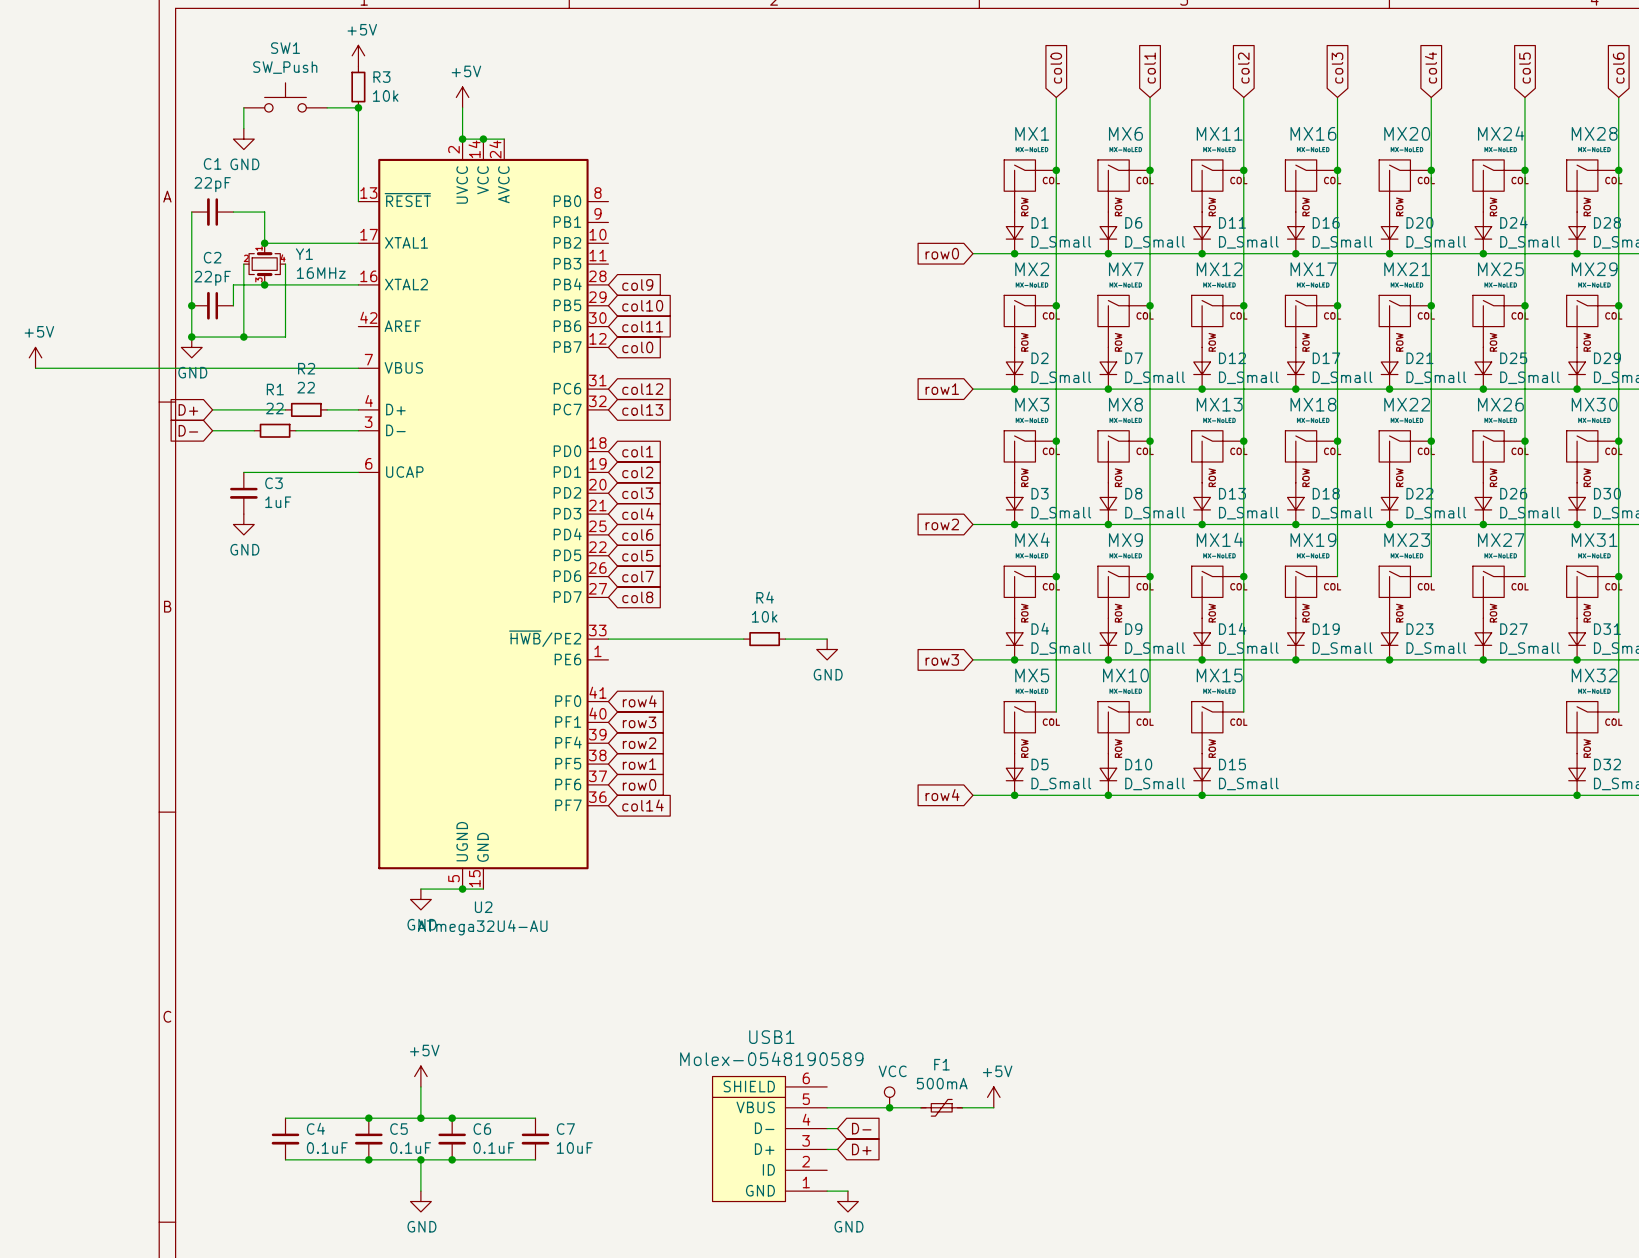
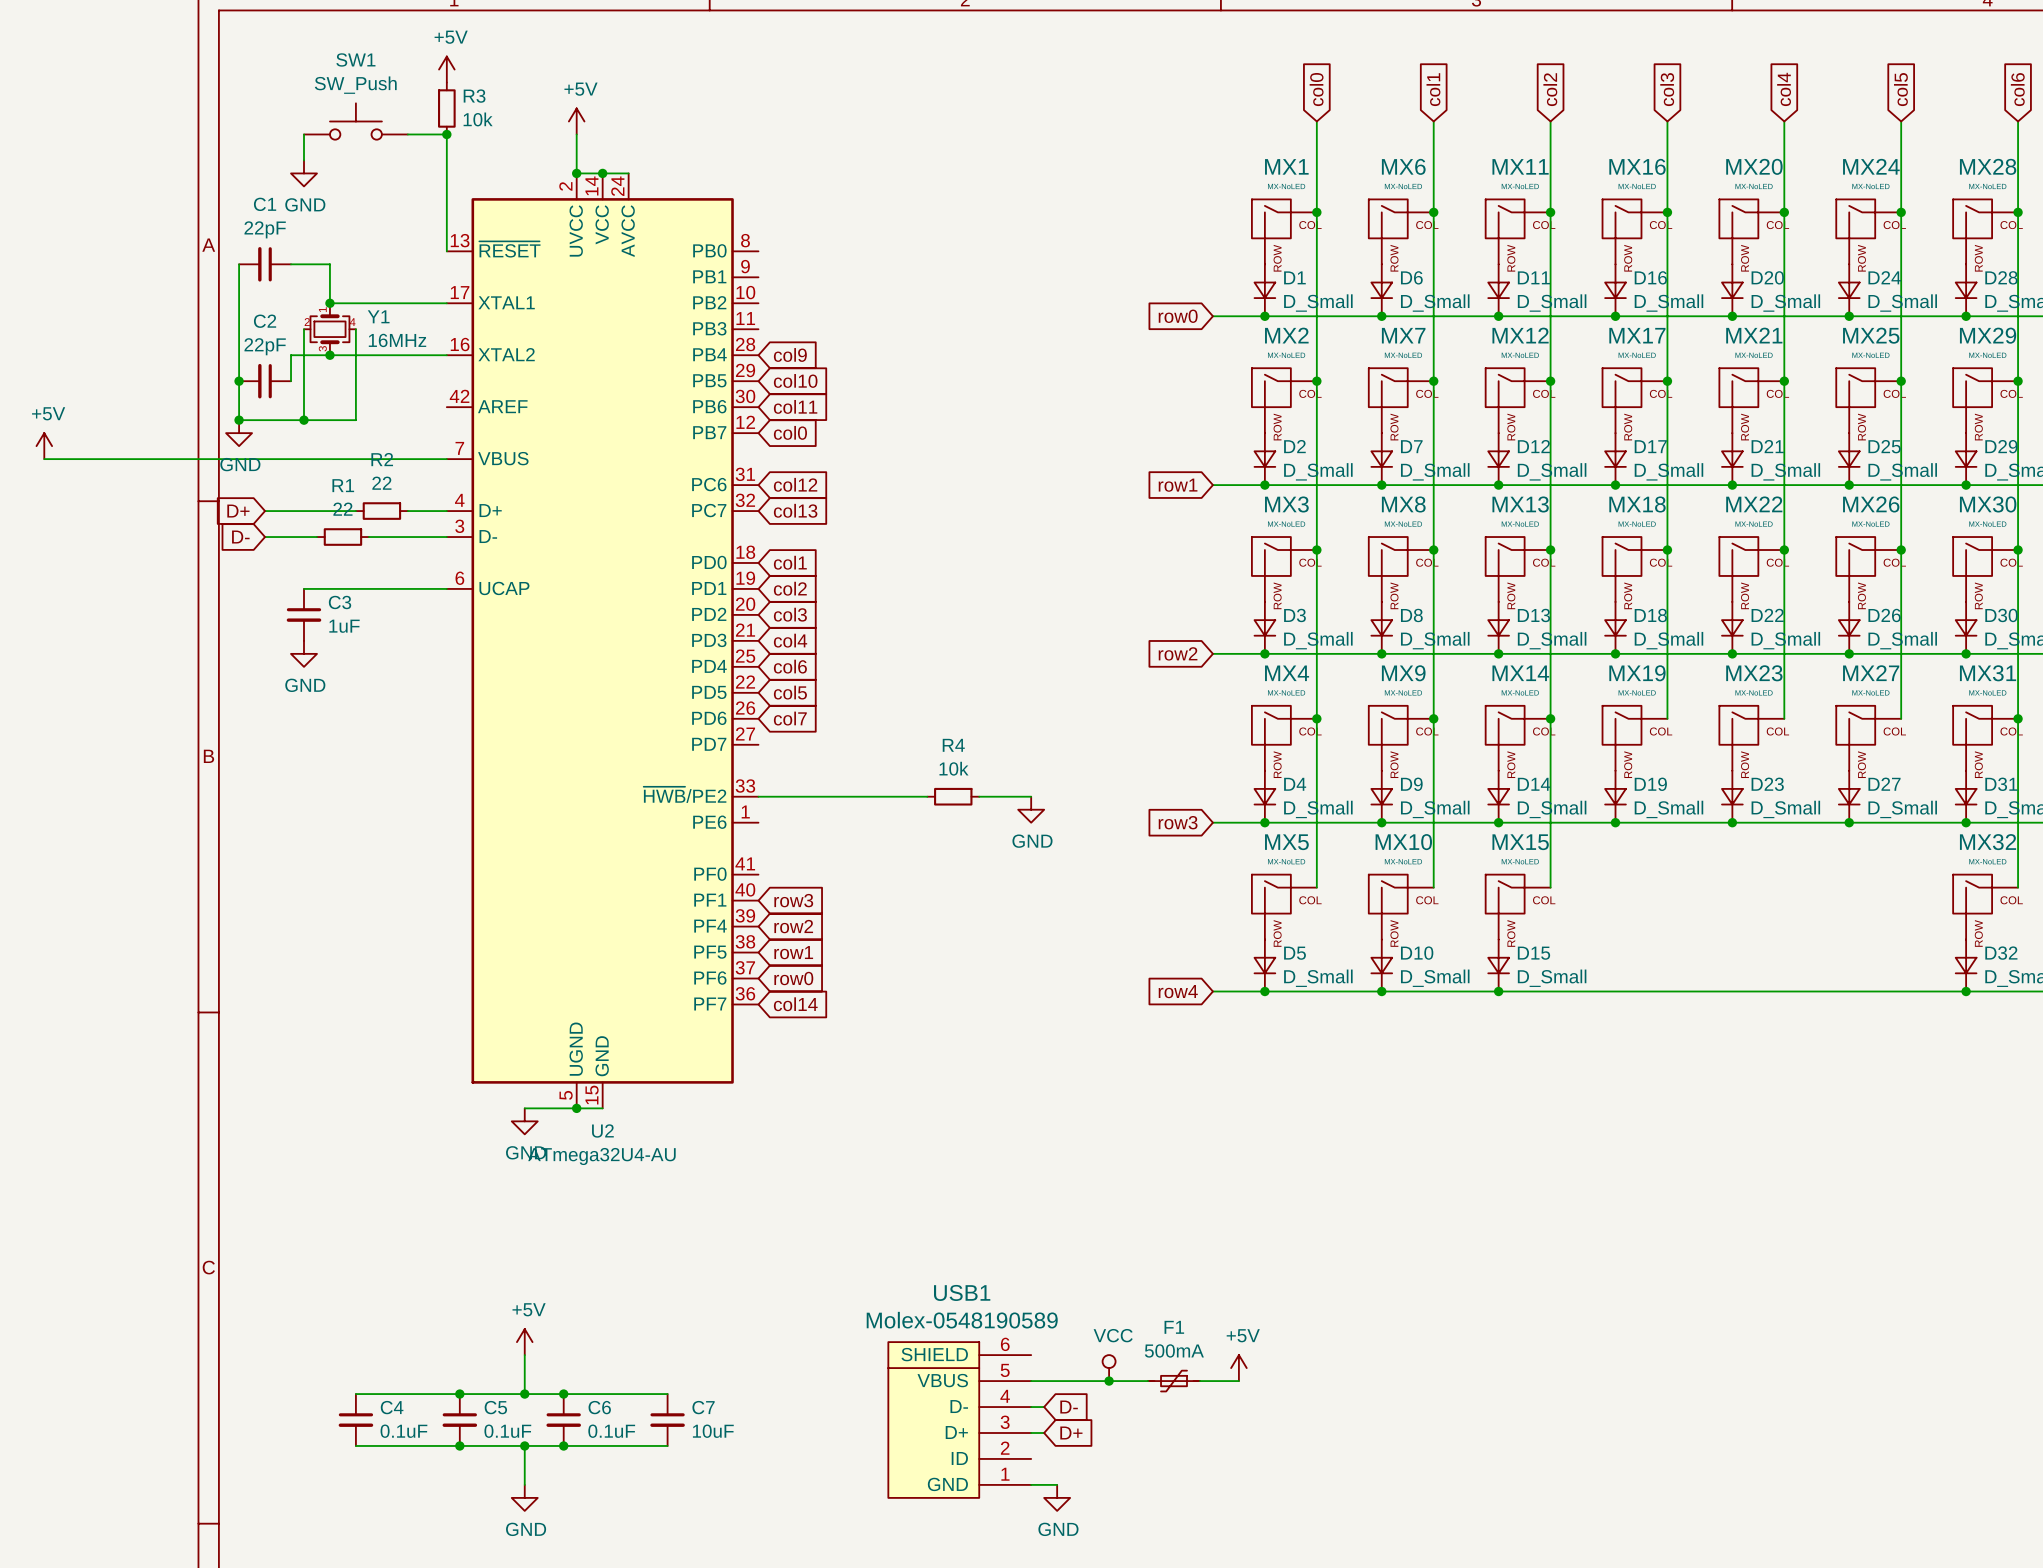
global label: col8 (637, 597) -> none
global label: row4 (639, 701) -> none

